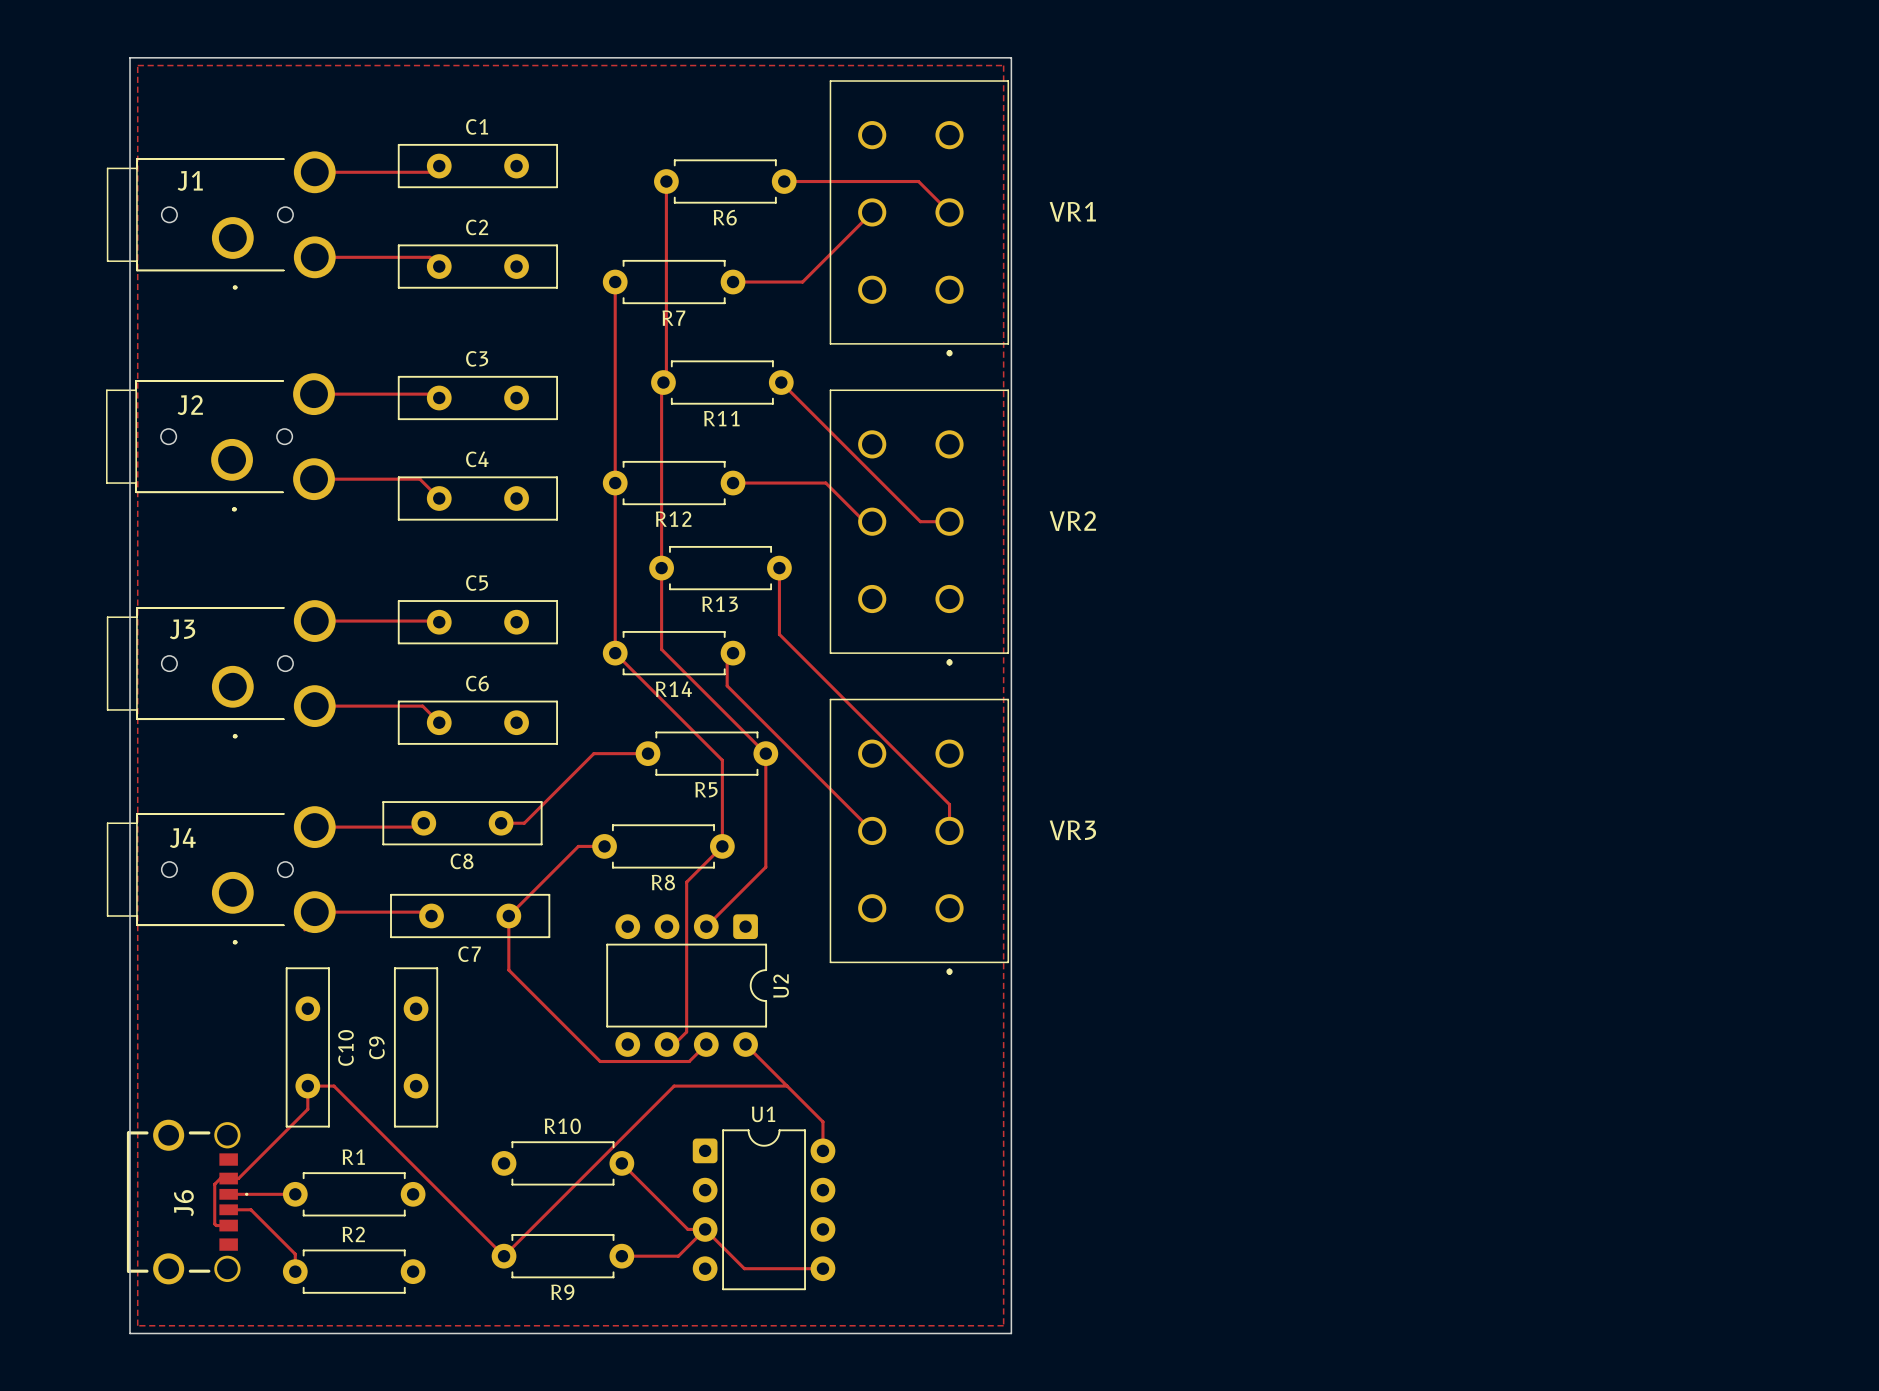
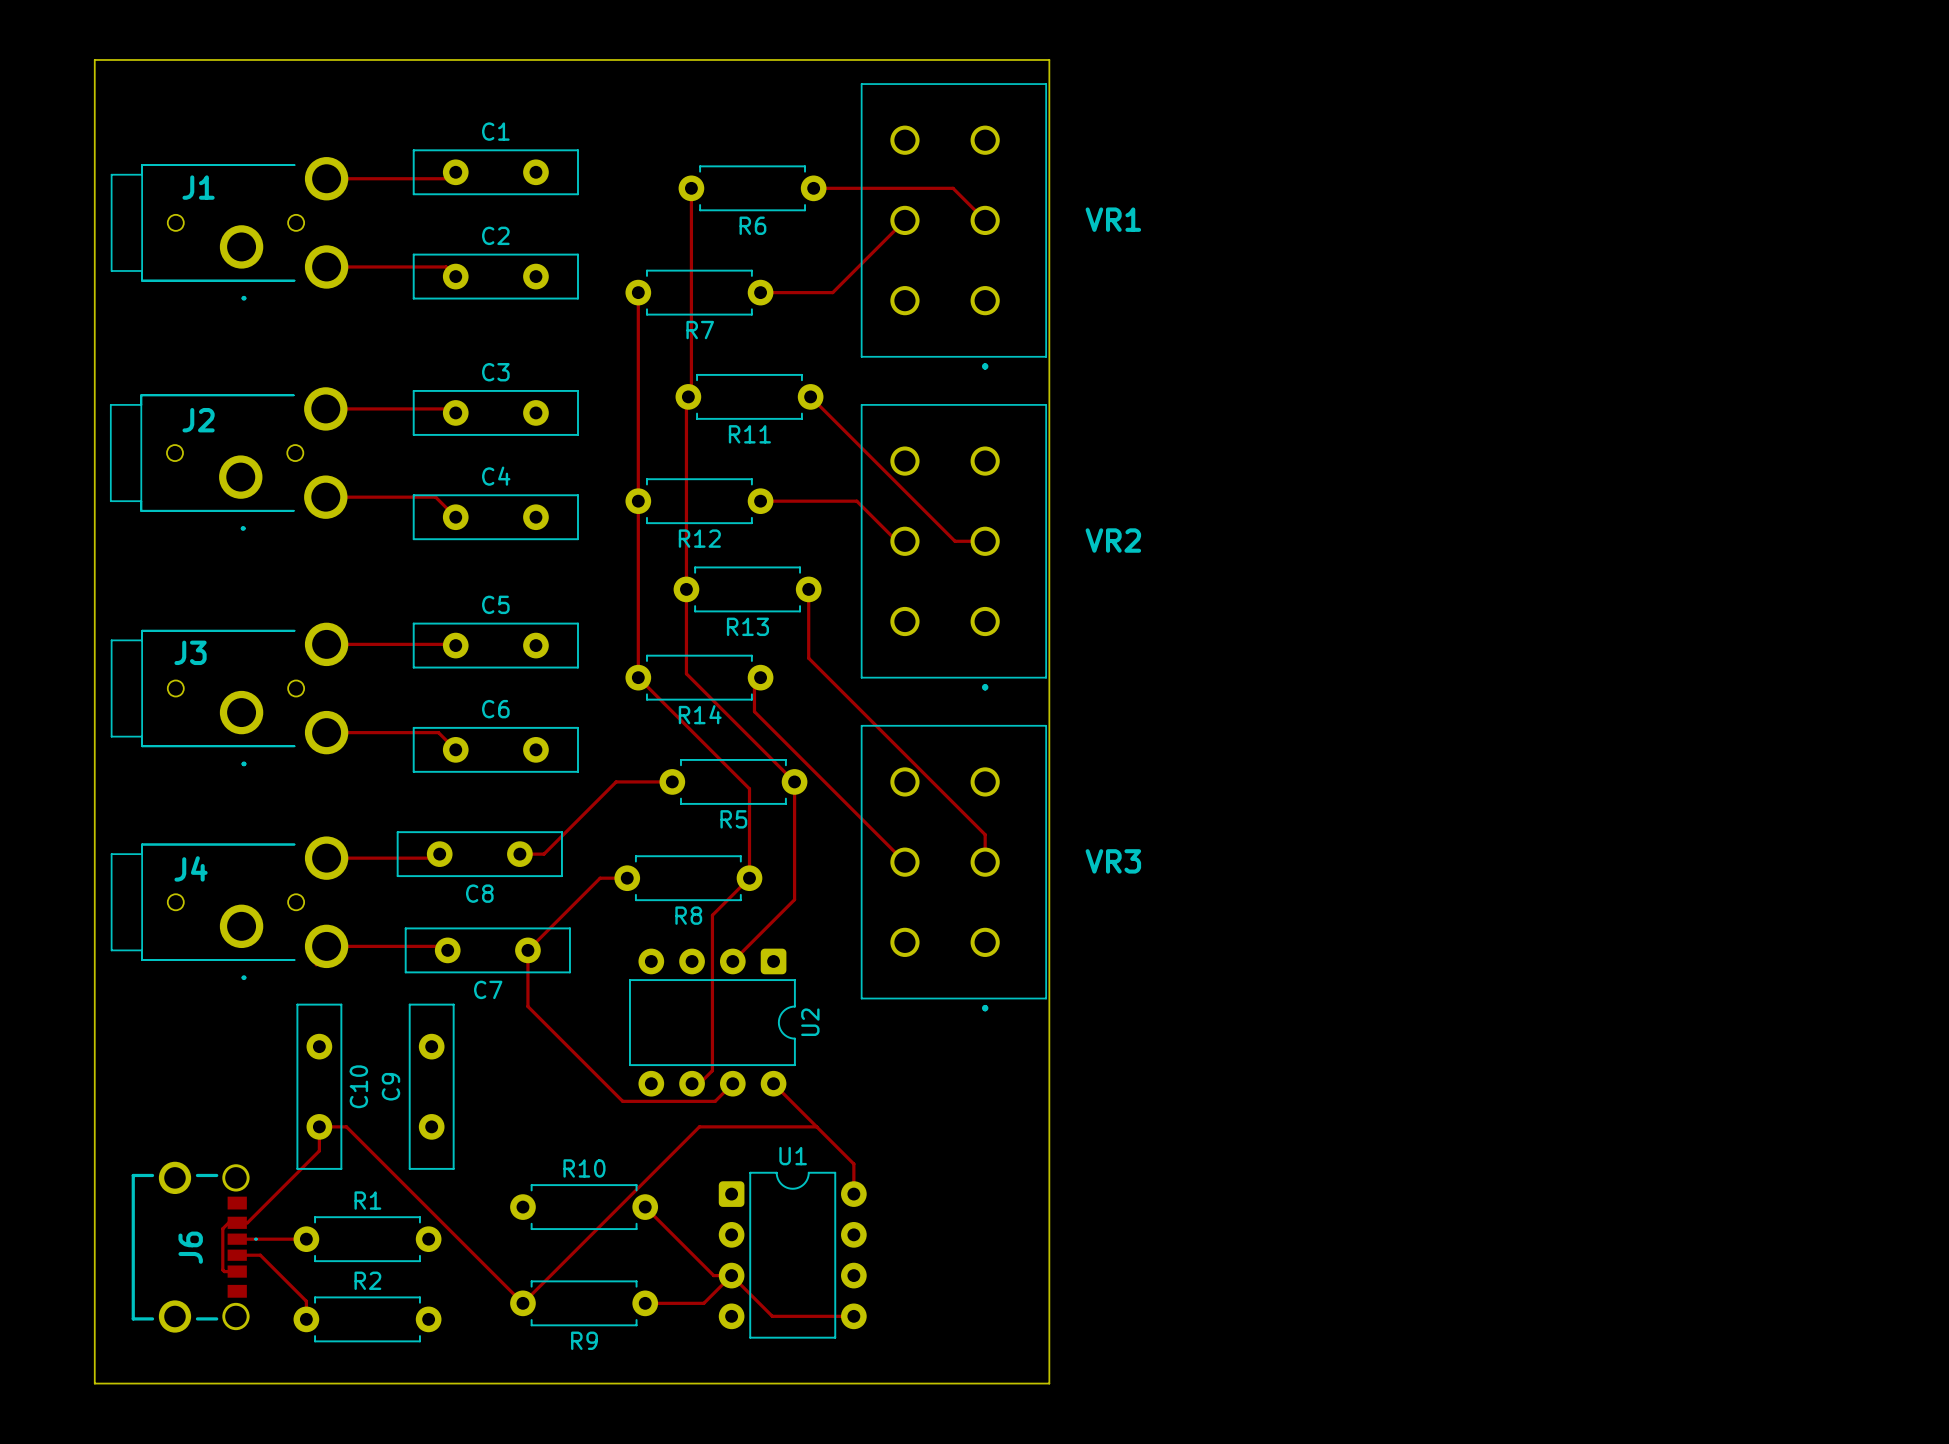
board edge: (129, 57) (129, 1333) -> (134, 59) (94, 59) (94, 1383) (134, 1383)
zone outline: (137, 65) (1003, 65) (1003, 1325) (137, 1325) (137, 65) -> none

